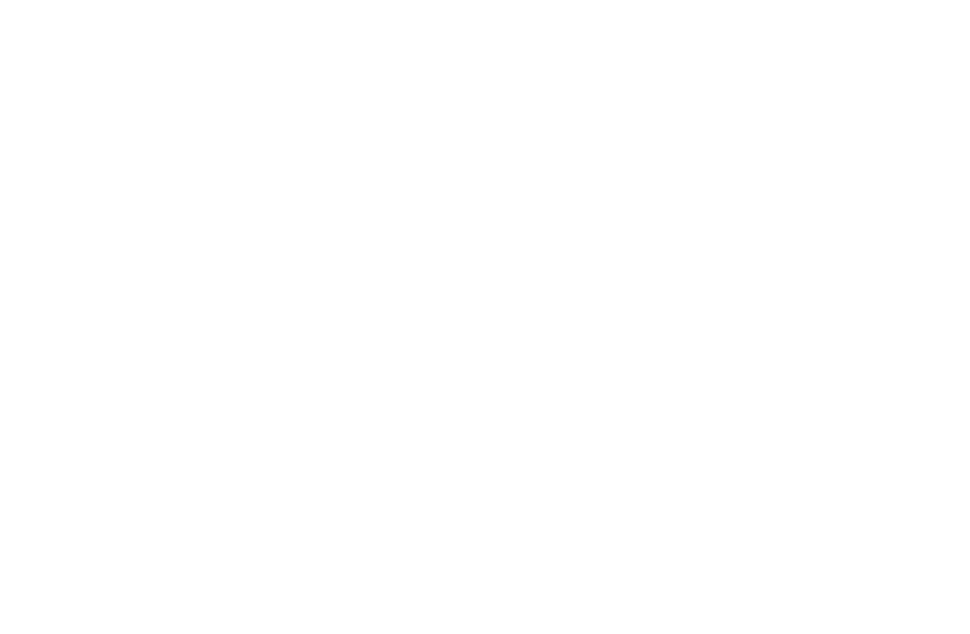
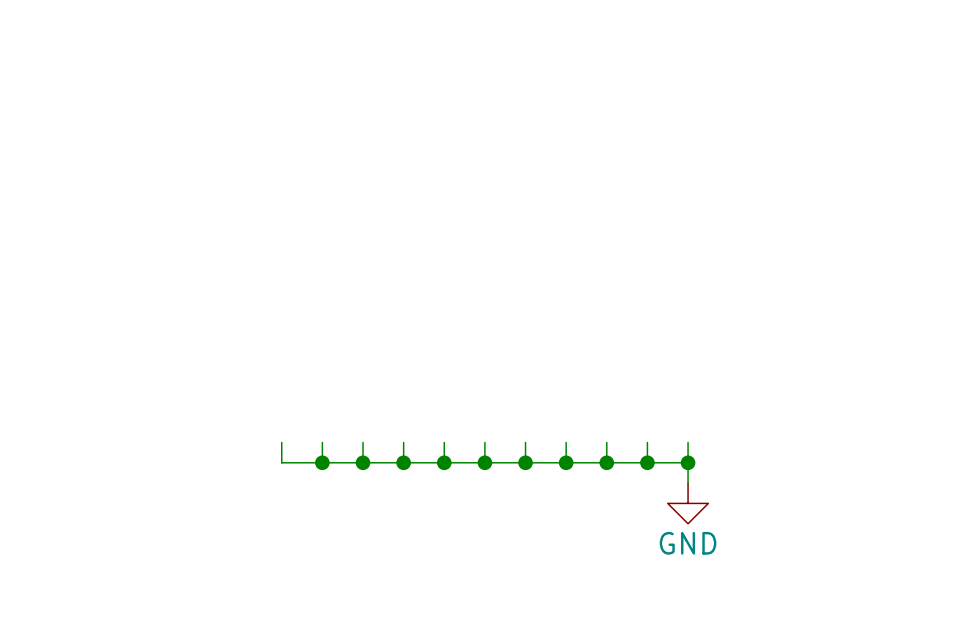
wire: none -> (281, 442) (281, 462) (688, 462)
wire: none -> (322, 442) (322, 462)
wire: none -> (363, 442) (363, 462)
wire: none -> (403, 442) (403, 462)
wire: none -> (444, 442) (444, 462)
wire: none -> (484, 442) (484, 462)
wire: none -> (525, 442) (525, 462)
wire: none -> (566, 442) (566, 462)
wire: none -> (606, 442) (606, 462)
wire: none -> (647, 442) (647, 462)
wire: none -> (688, 442) (688, 483)
junction: none -> (322, 462)
junction: none -> (363, 462)
junction: none -> (403, 462)
junction: none -> (444, 462)
junction: none -> (484, 462)
junction: none -> (525, 462)
junction: none -> (566, 462)
junction: none -> (606, 462)
junction: none -> (647, 462)
junction: none -> (688, 462)
power symbol: none -> GND (688, 503)

